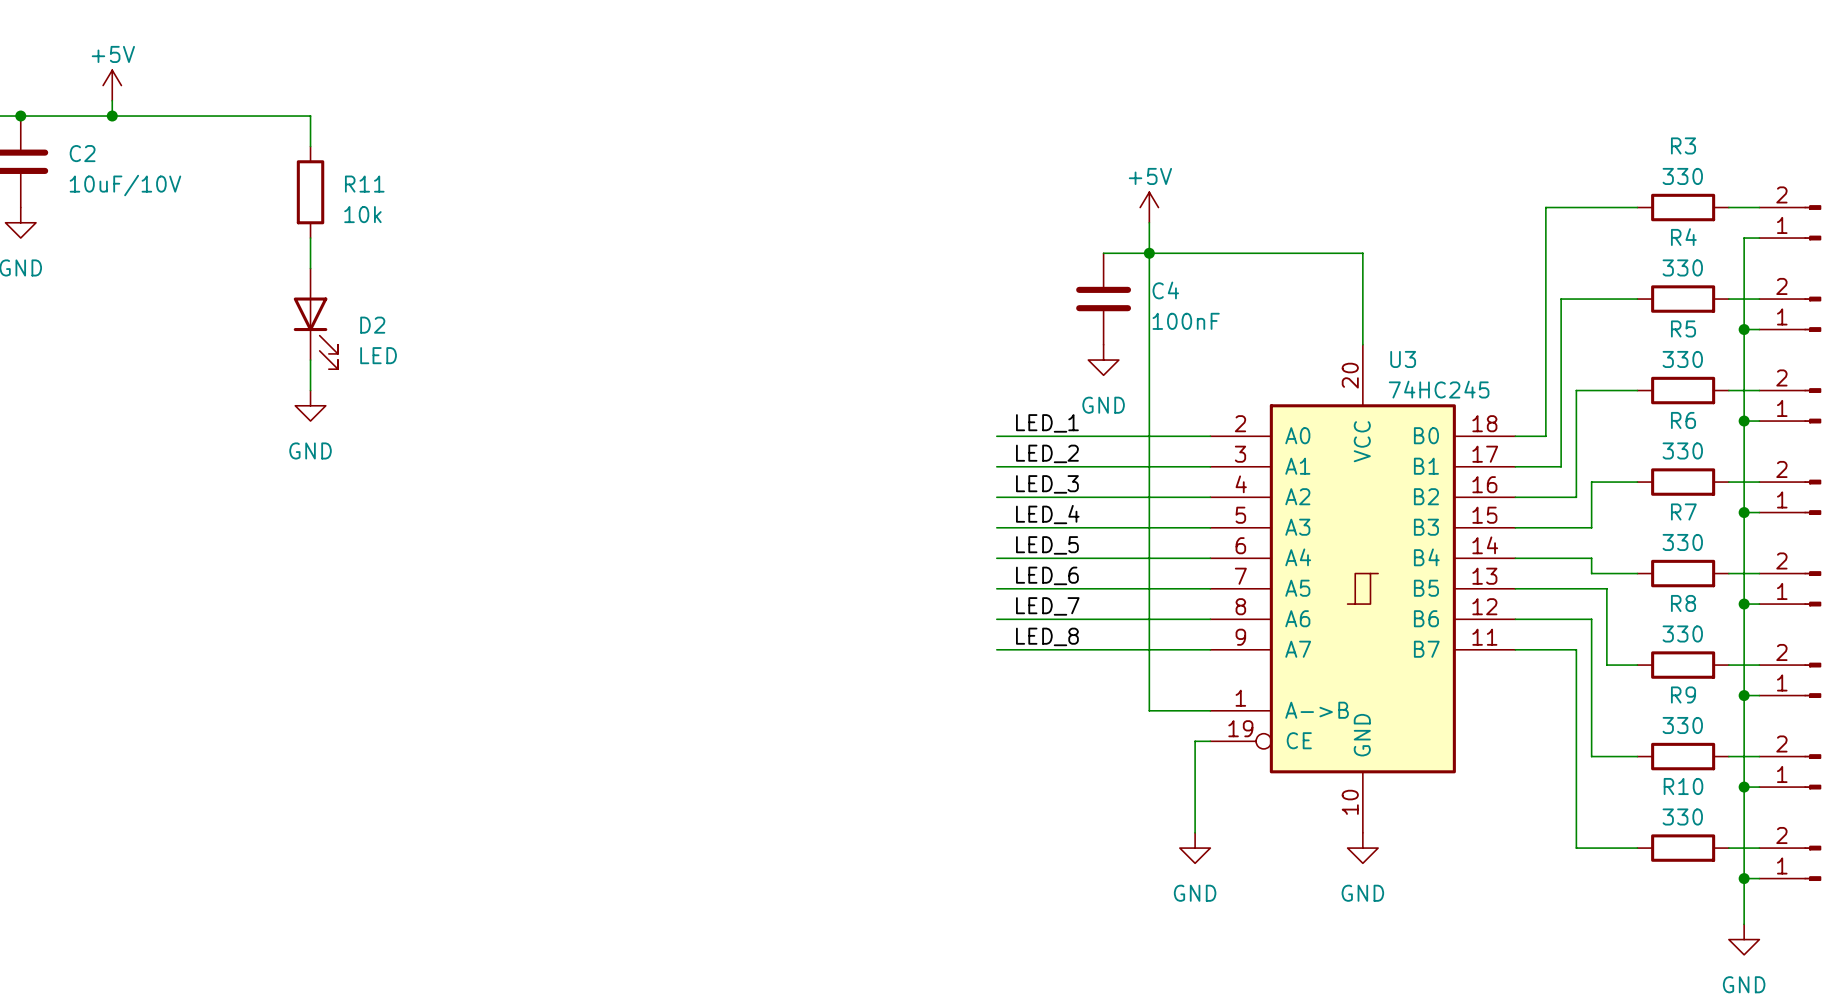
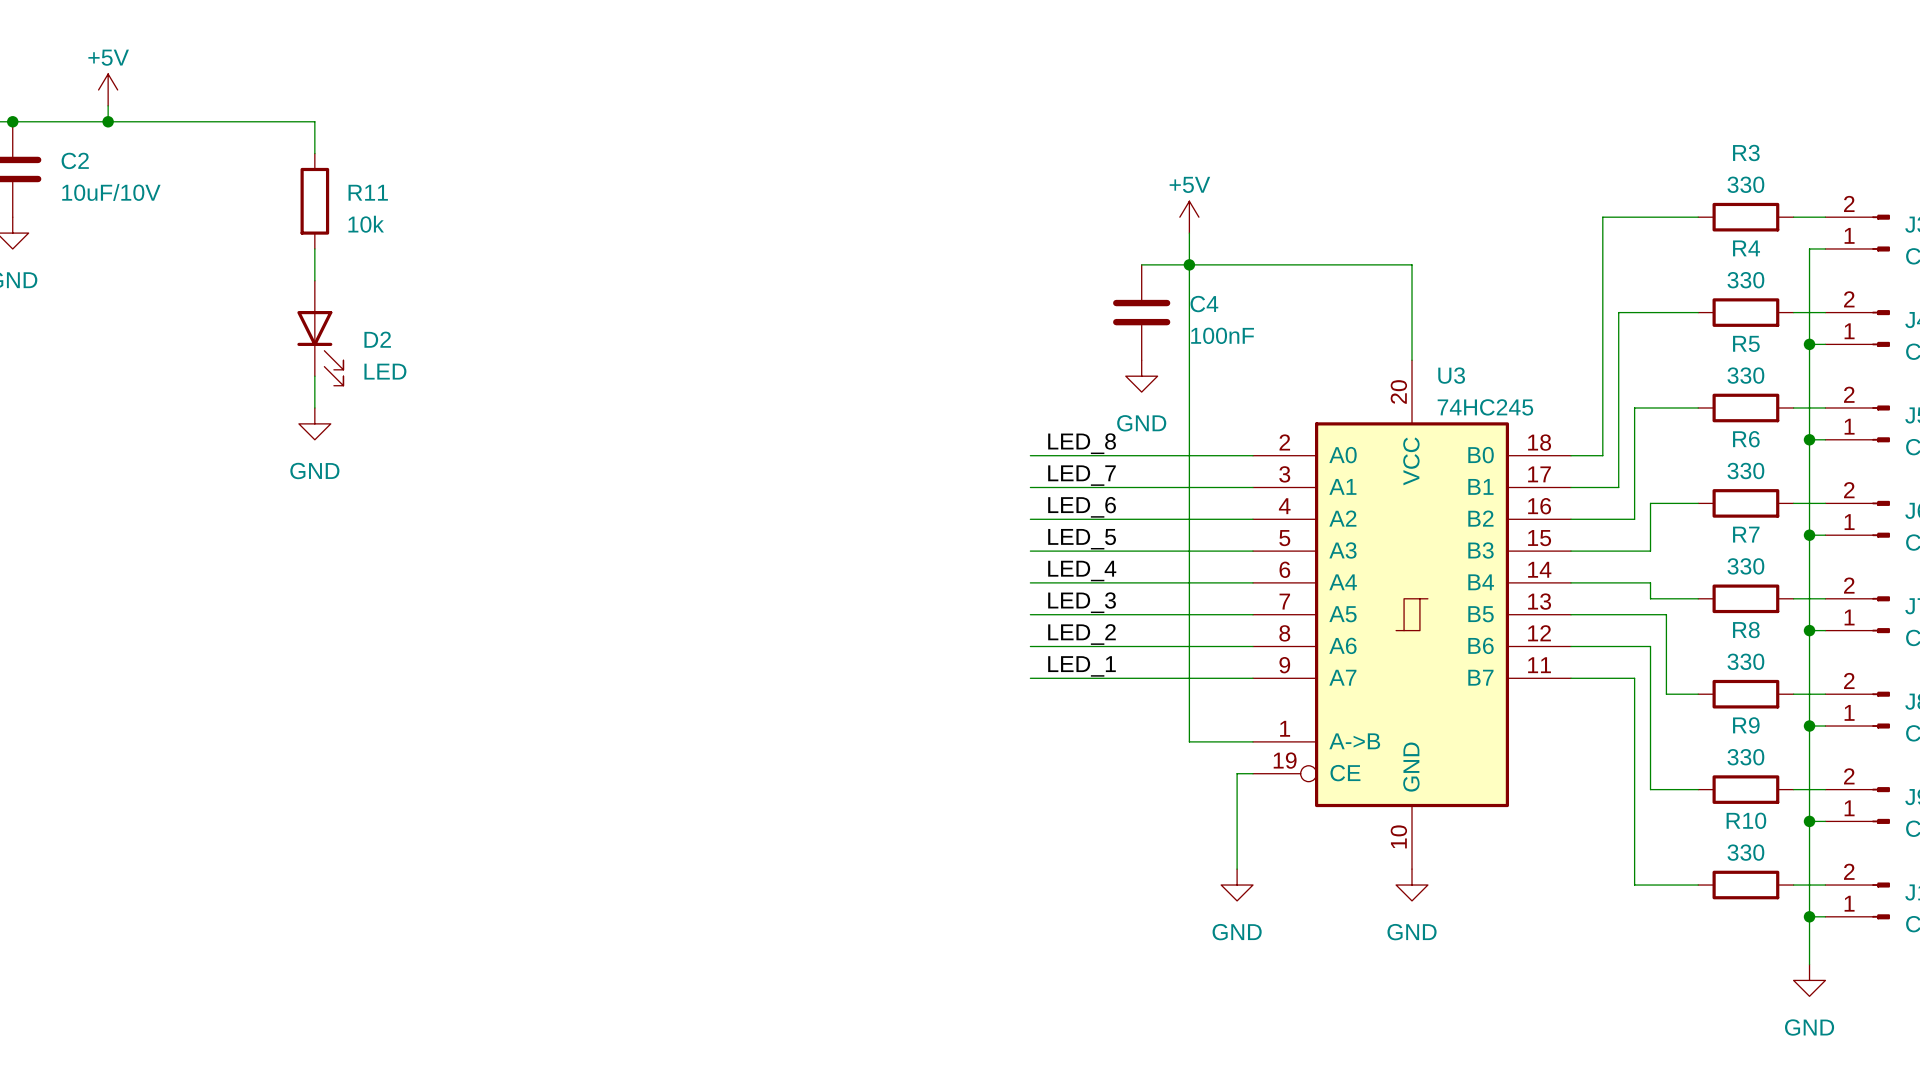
label: LED_1 (1047, 423) -> LED_8 (1082, 443)
label: LED_2 (1047, 453) -> LED_7 (1081, 475)
label: LED_3 (1047, 484) -> LED_6 (1082, 507)
label: LED_4 (1047, 514) -> LED_5 (1082, 539)
label: LED_5 (1047, 545) -> LED_4 (1082, 571)
label: LED_6 (1047, 575) -> LED_3 (1082, 602)
label: LED_7 (1047, 606) -> LED_2 (1081, 634)
label: LED_8 (1047, 636) -> LED_1 (1082, 666)

